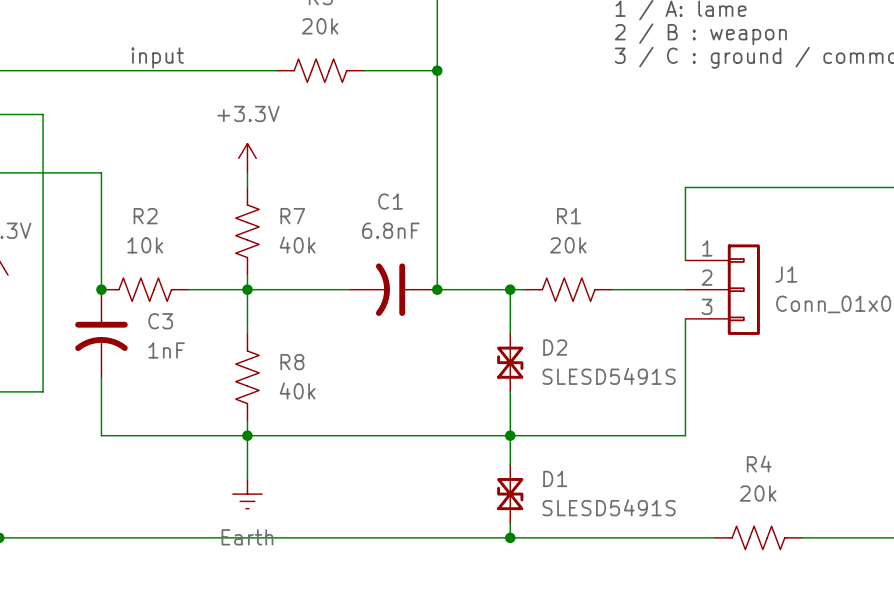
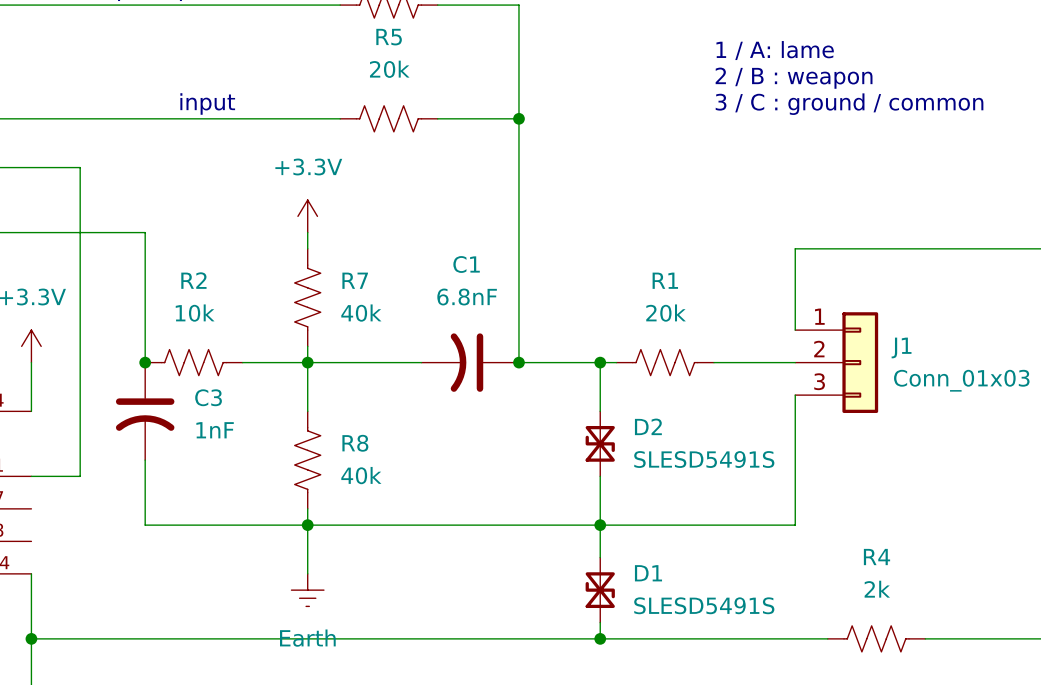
R4 value: 20k (758, 493) -> 2k (877, 589)

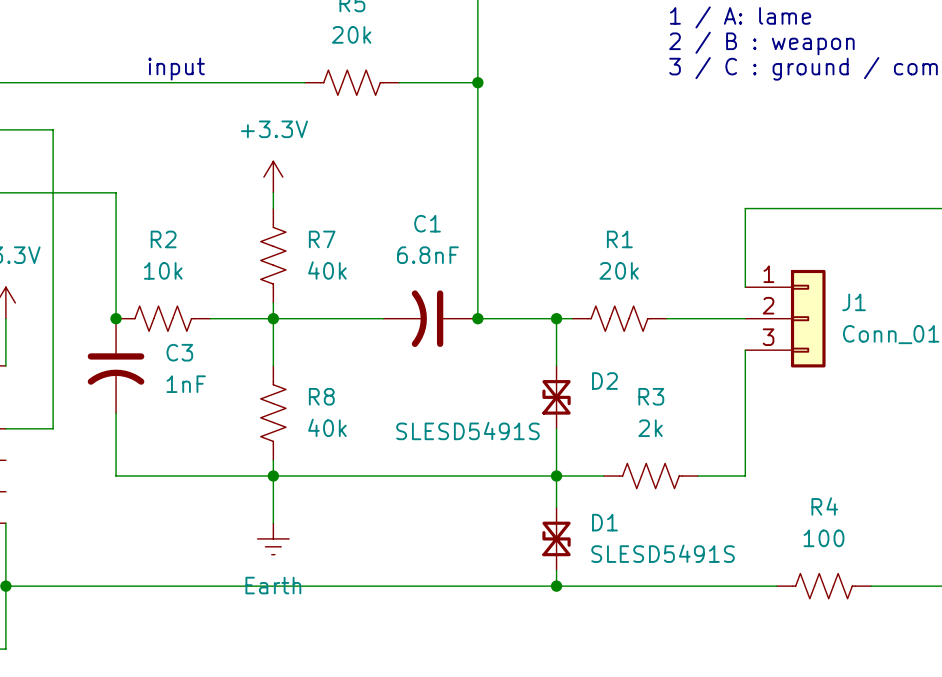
D2 value position: SLESD5491S (704, 459) -> SLESD5491S (467, 431)
R3: none -> 2k (650, 476)
R4 value: 2k (877, 589) -> 100 (823, 538)

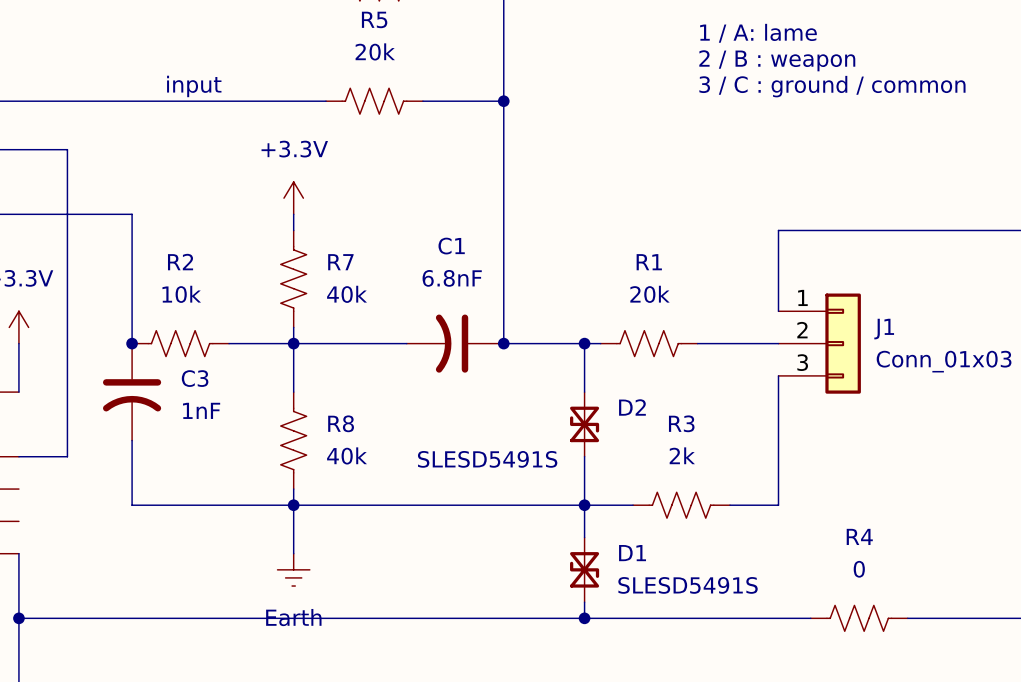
R4 value: 100 (823, 538) -> 0 (859, 569)

